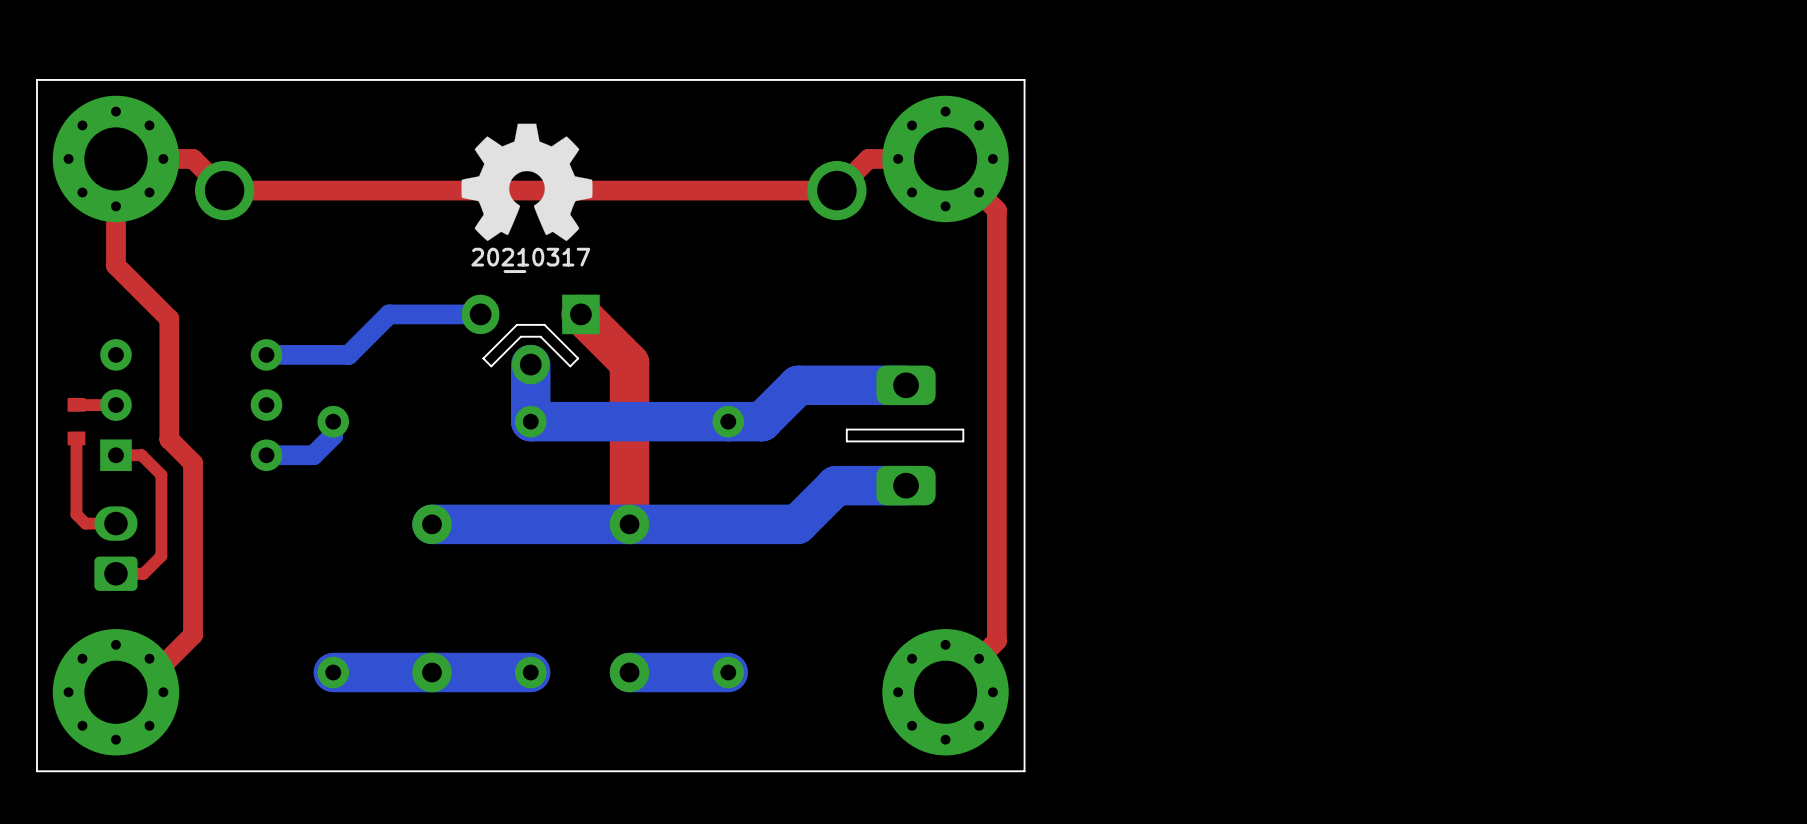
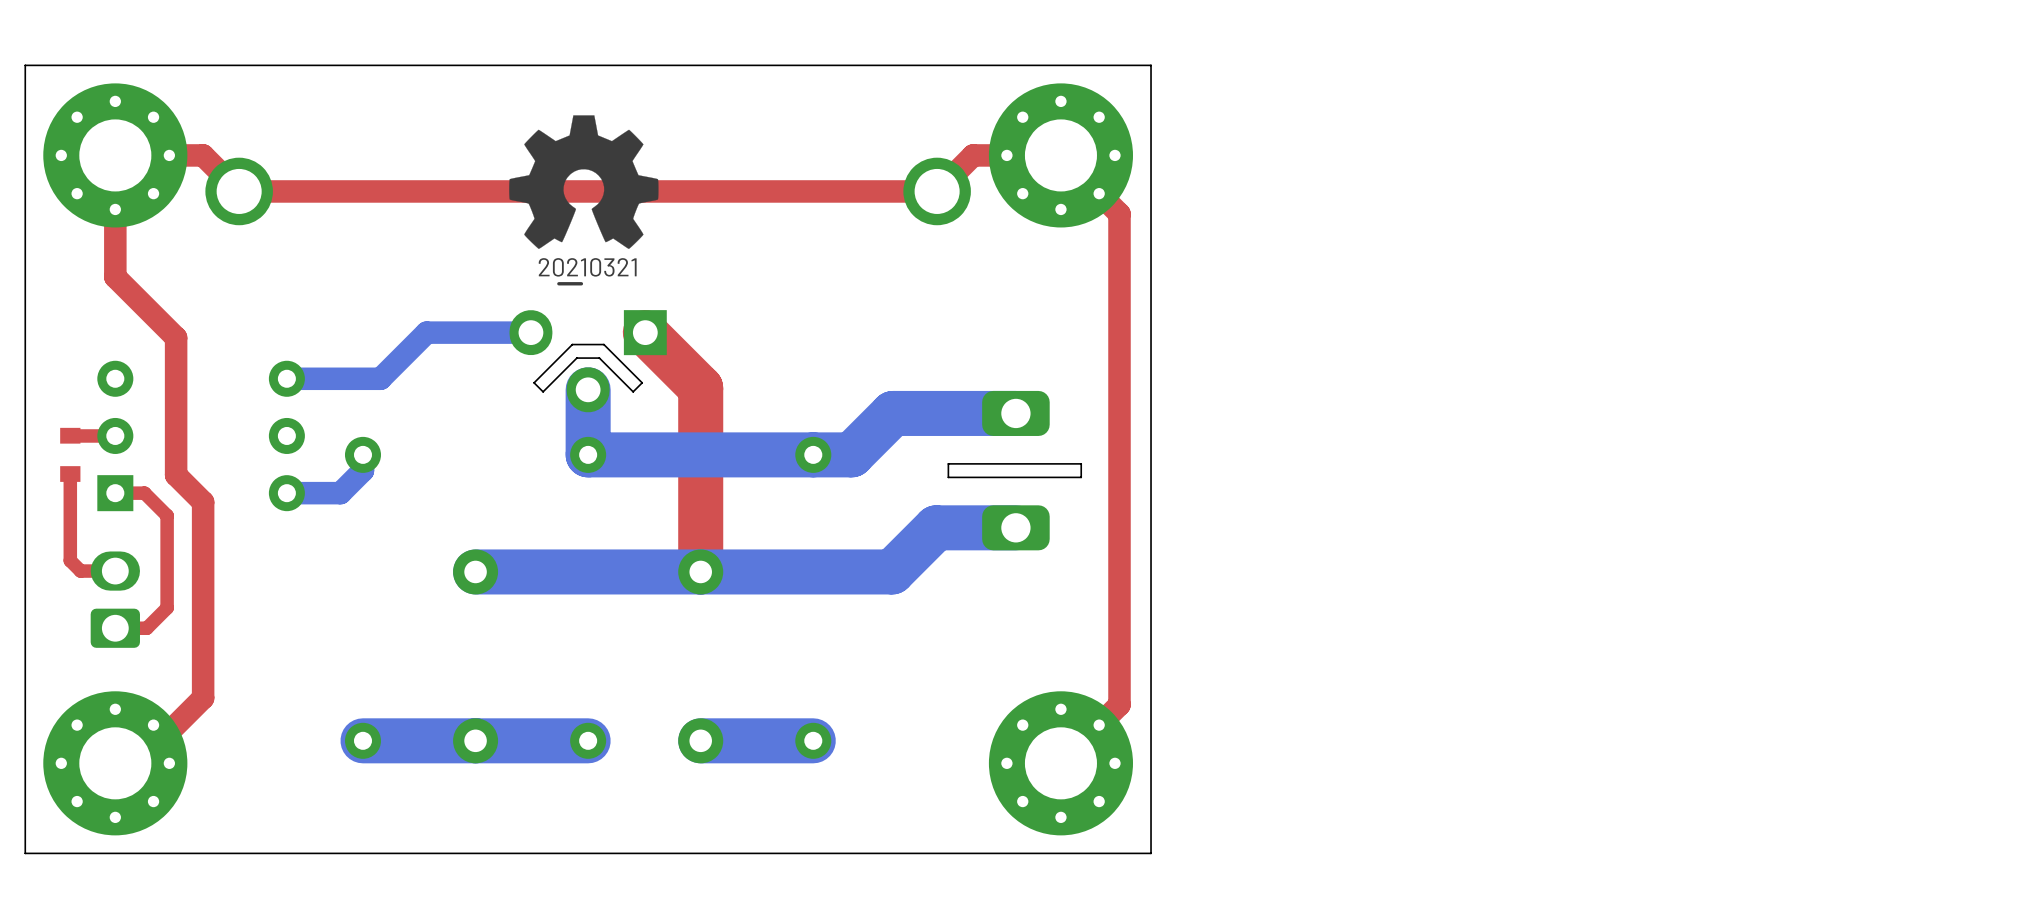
drawing shape: [471, 247, 591, 274] -> [538, 258, 637, 286]

